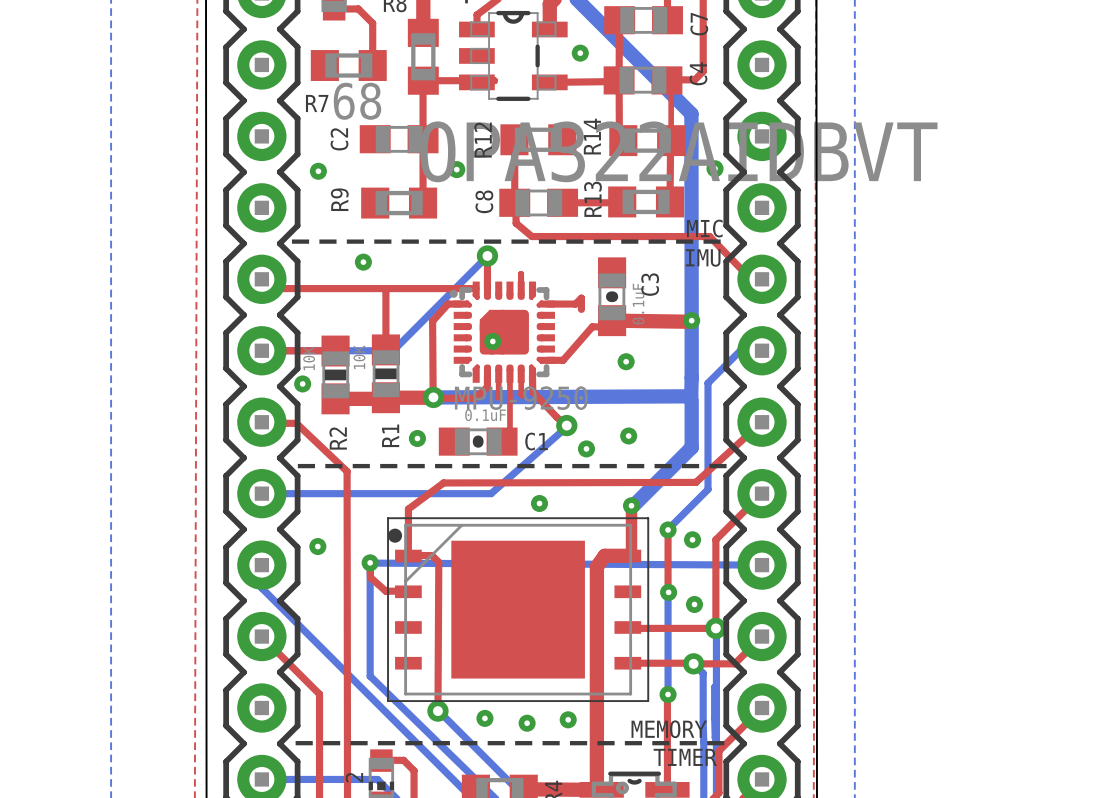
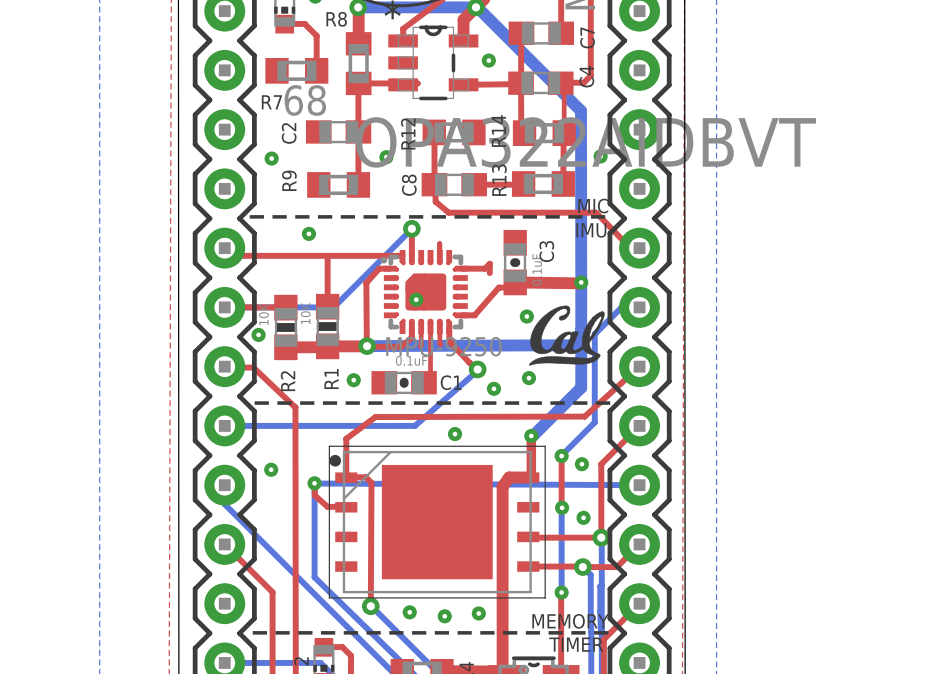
drawing: none -> [528, 305, 605, 366]

